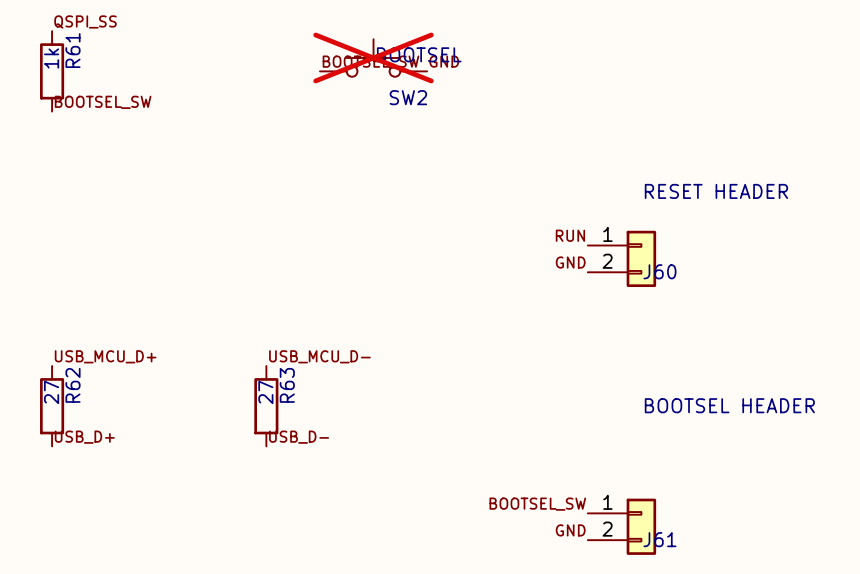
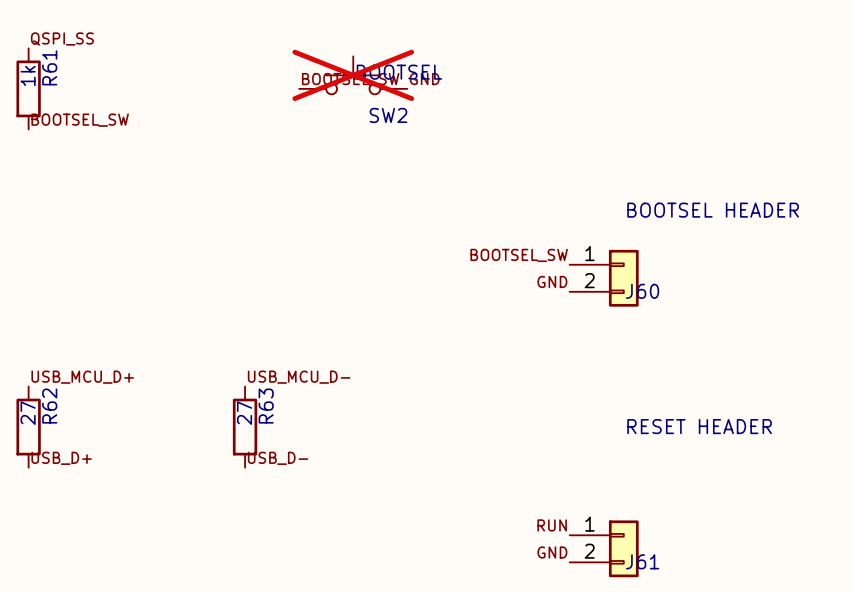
J60 value: RESET HEADER (716, 191) -> BOOTSEL HEADER (713, 210)
label: RUN (570, 235) -> BOOTSEL_SW (519, 255)
J61 value: BOOTSEL HEADER (729, 405) -> RESET HEADER (699, 426)
label: BOOTSEL_SW (537, 504) -> RUN (552, 525)

